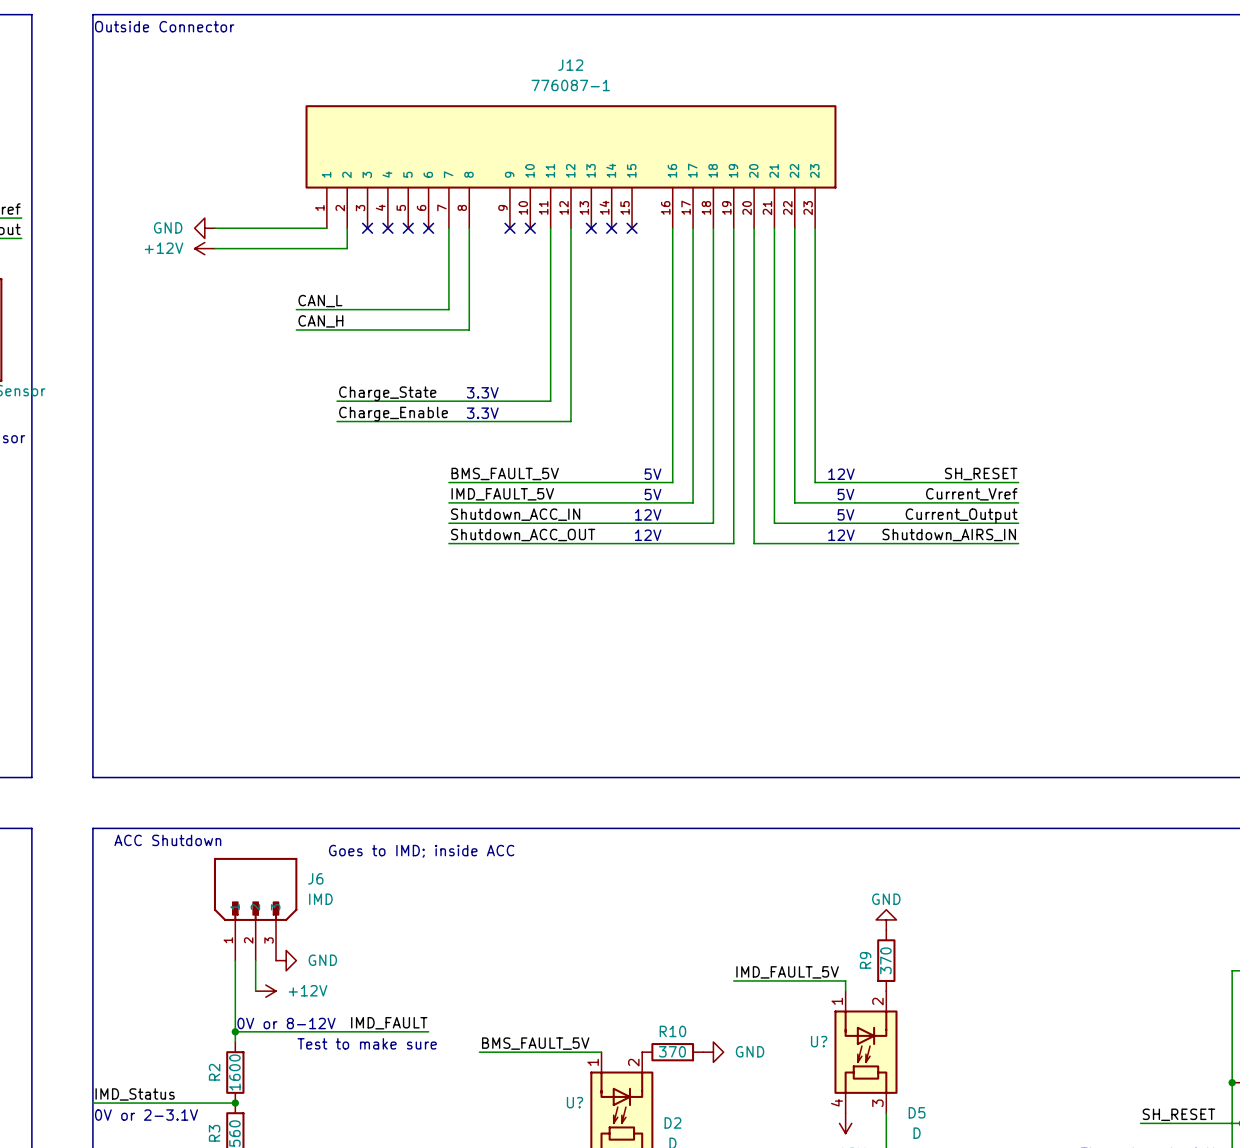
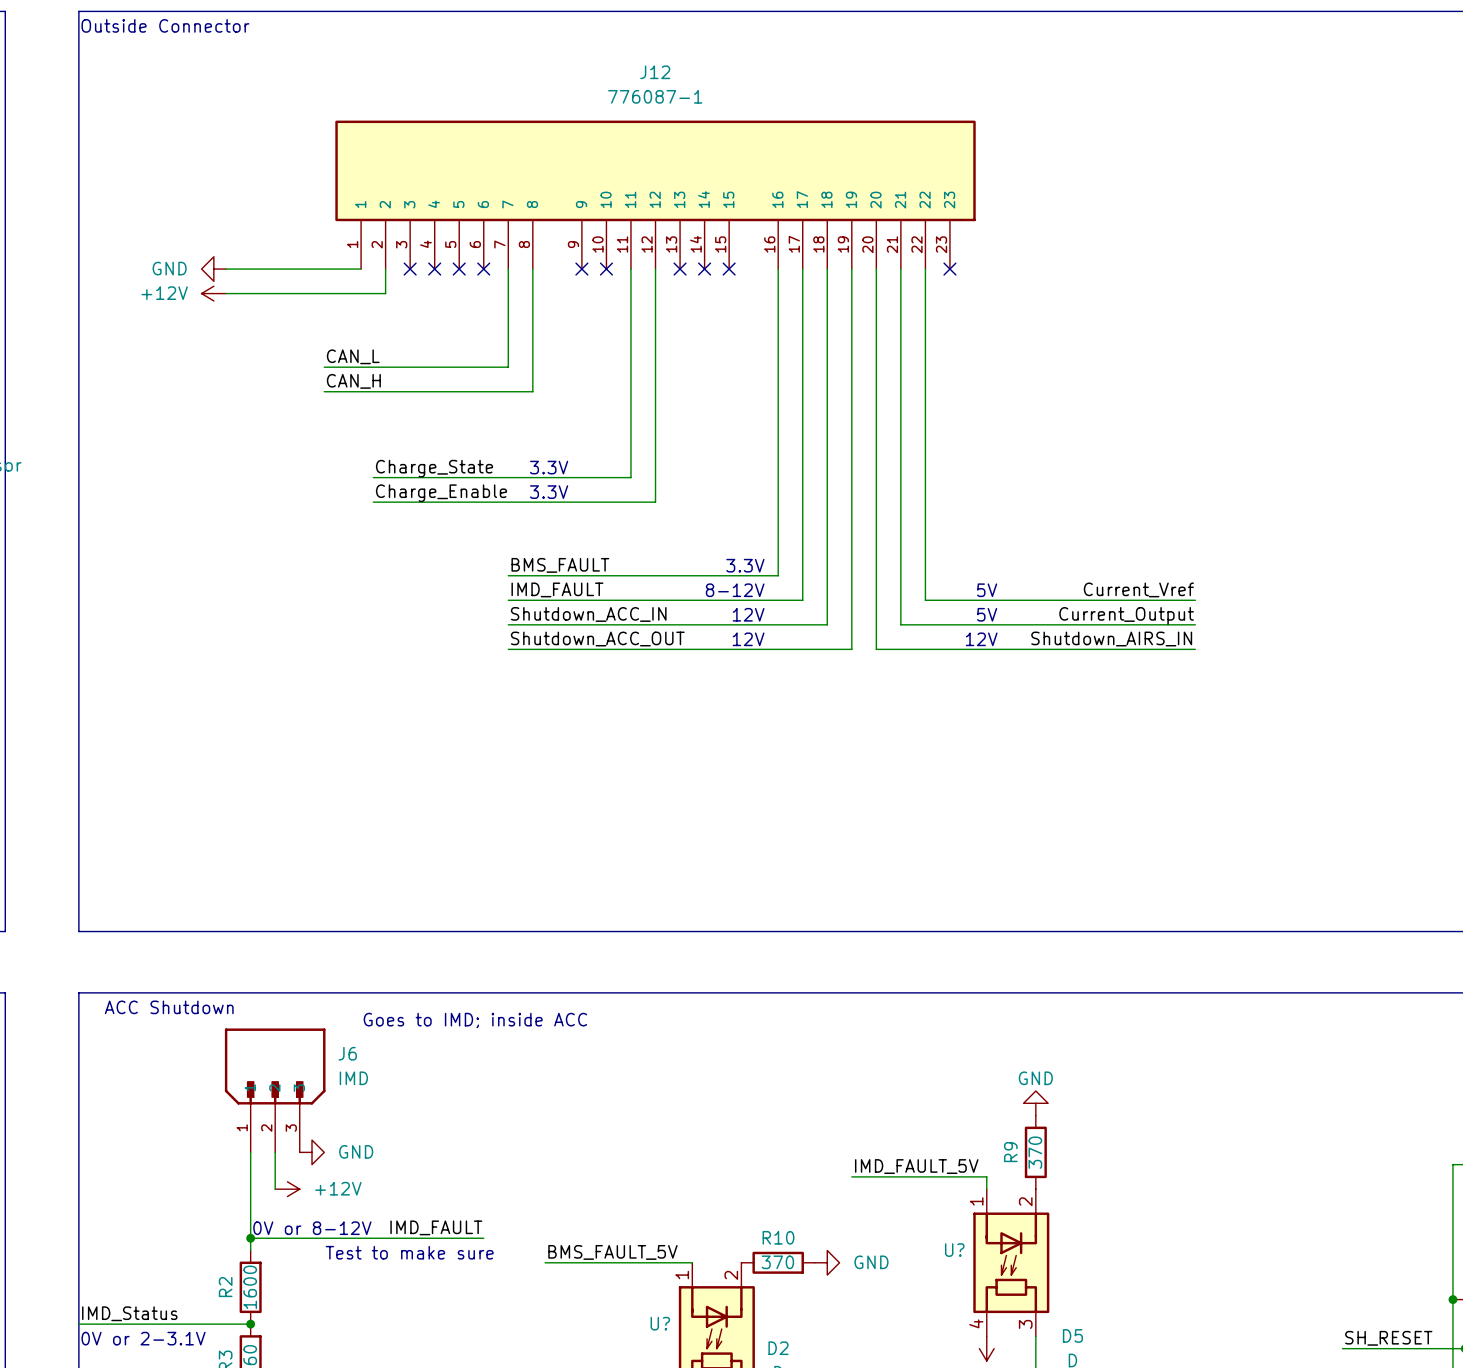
wire: (815, 228) (815, 482) (1018, 482) -> none
no-connect mark: none -> (949, 269)
label: BMS_FAULT_5V (505, 473) -> BMS_FAULT (560, 565)
label: SH_RESET (981, 473) -> none
text: 5V (653, 474) -> 3.3V (745, 565)
text: 12V (841, 474) -> none
label: IMD_FAULT_5V (502, 494) -> IMD_FAULT (557, 589)
text: 5V (653, 494) -> 8-12V (735, 590)

